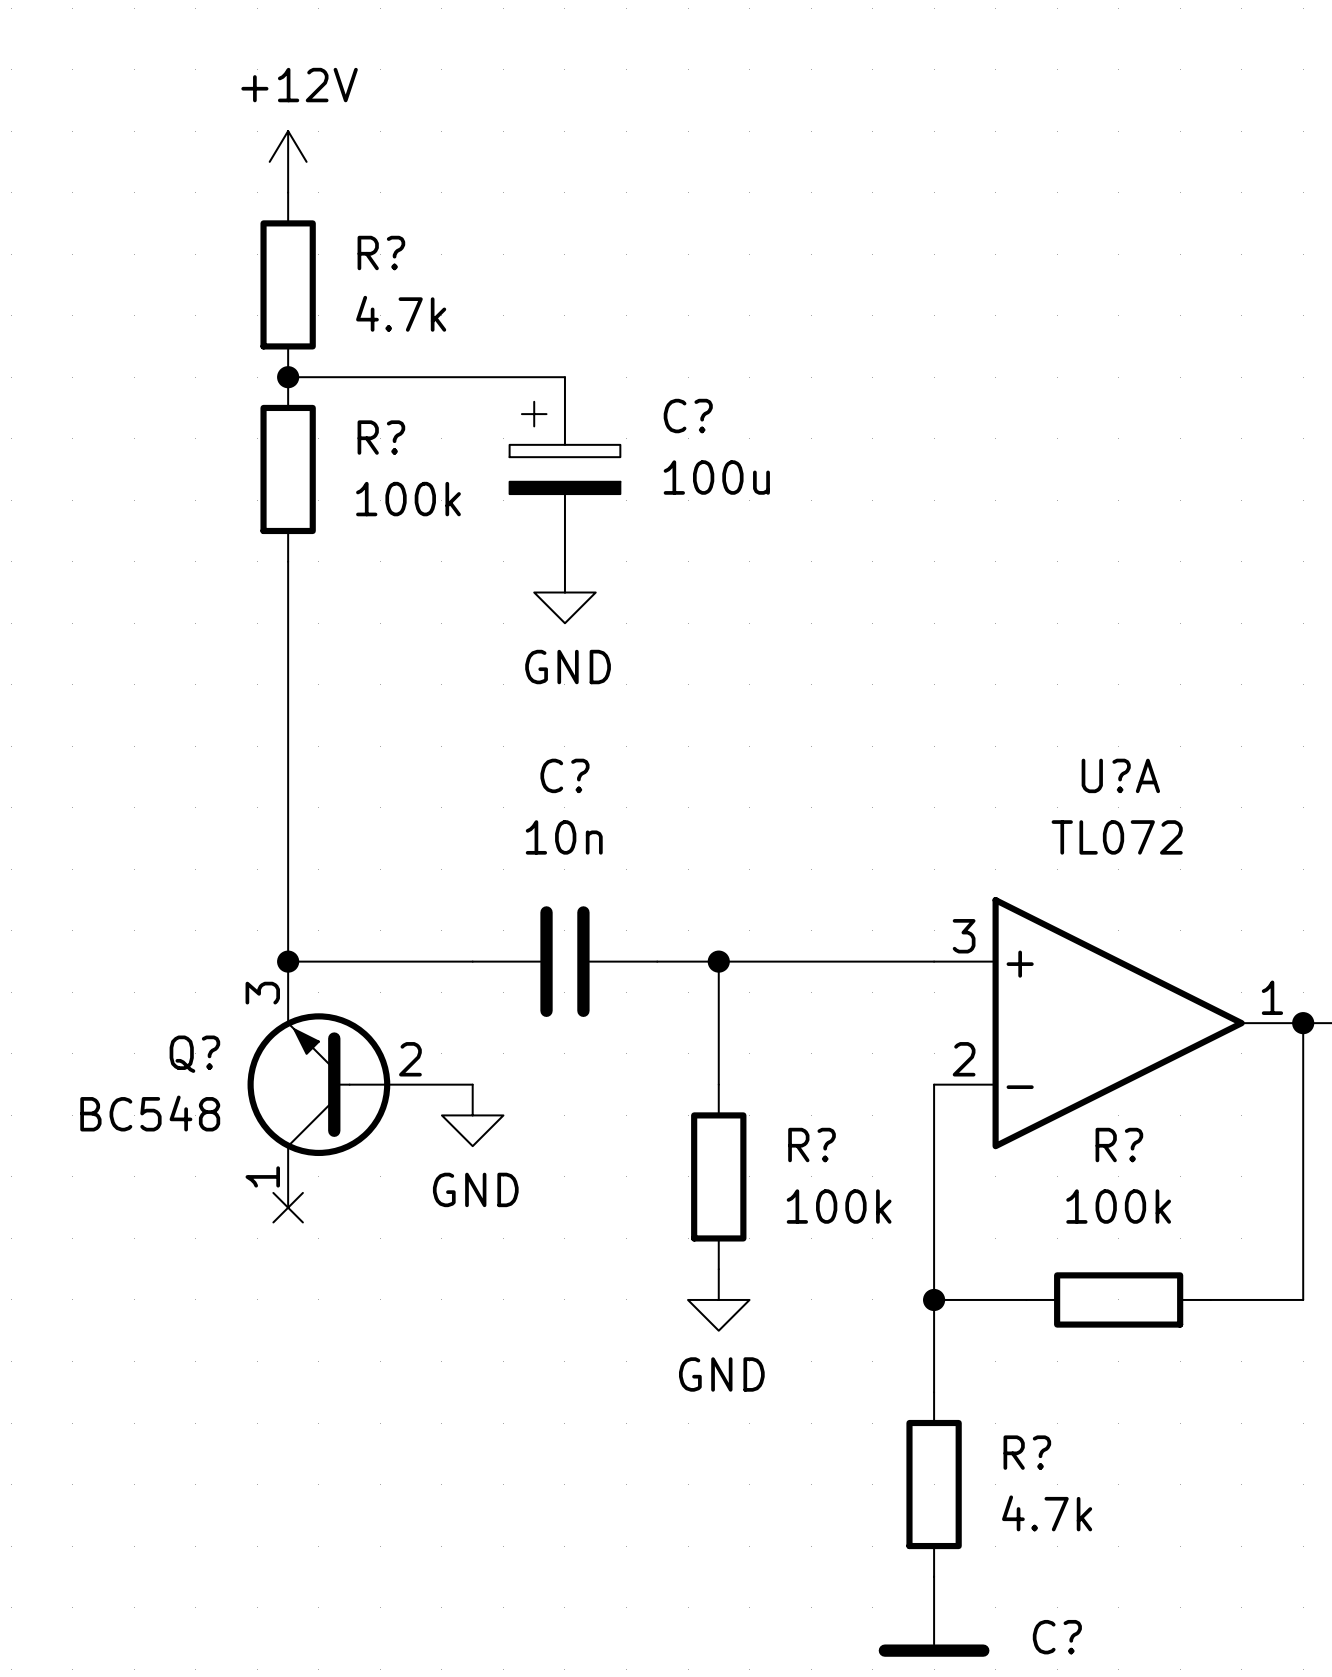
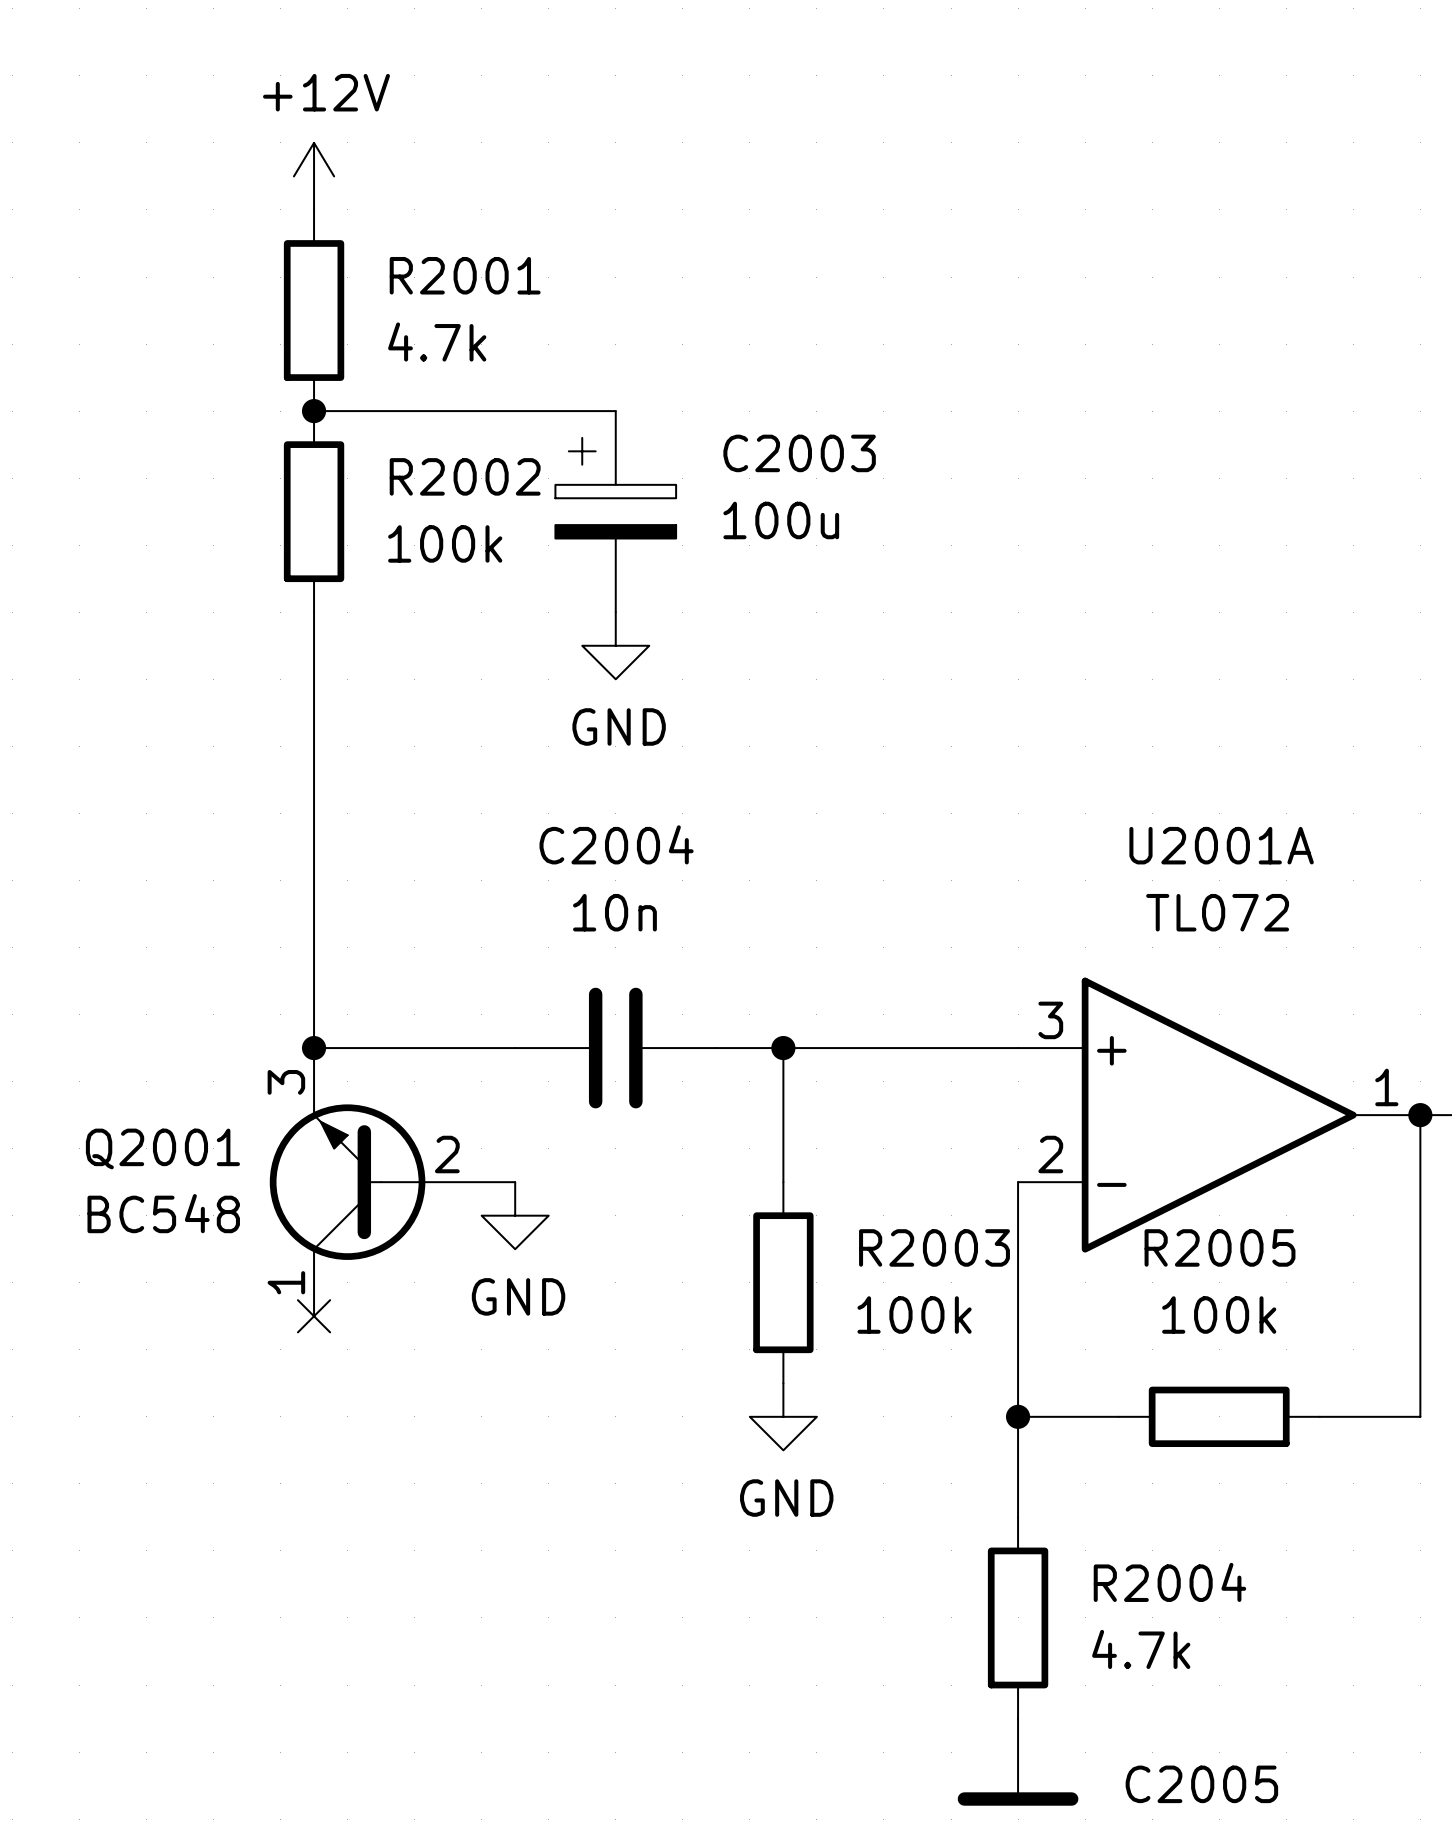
R? name: R? (381, 253) -> R2001 (465, 275)
C? name: C? (688, 416) -> C2003 (799, 453)
R? name: R? (381, 437) -> R2002 (465, 476)
C? name: C? (564, 775) -> C2004 (616, 844)
U?A name: U?A (1120, 775) -> U2001A (1221, 845)
Q? name: Q? (194, 1054) -> Q2001 (162, 1148)
R? name: R? (812, 1145) -> R2003 (934, 1247)
R? name: R? (1119, 1145) -> R2005 (1220, 1247)
R? name: R? (1027, 1452) -> R2004 (1169, 1582)
C? name: C? (1057, 1637) -> C2005 (1201, 1784)

